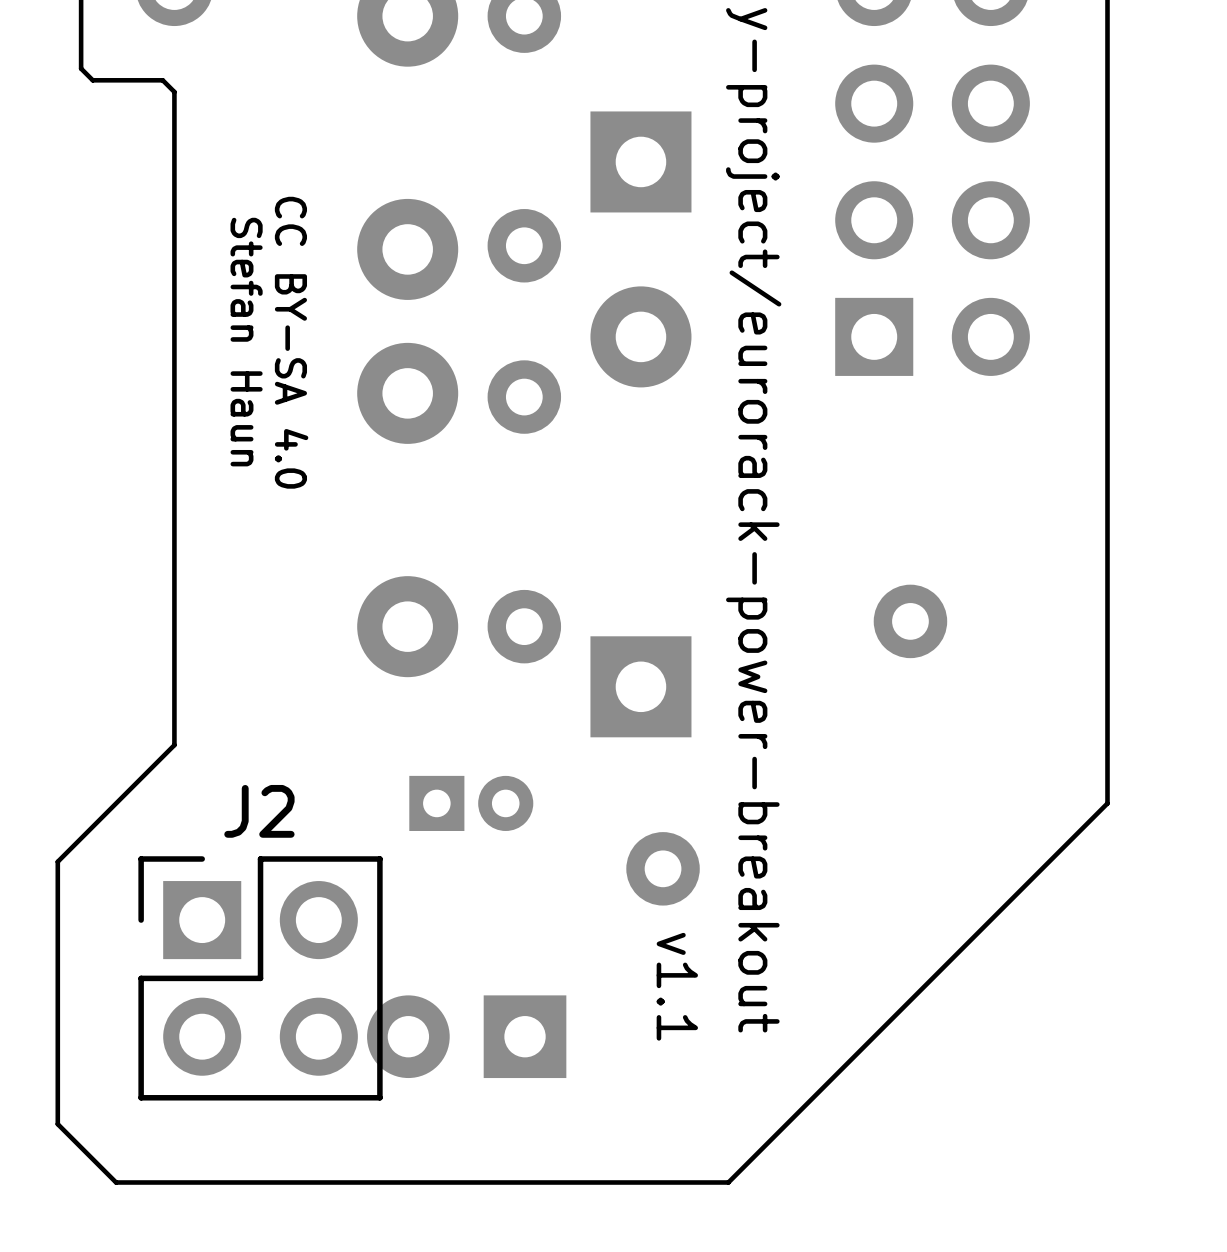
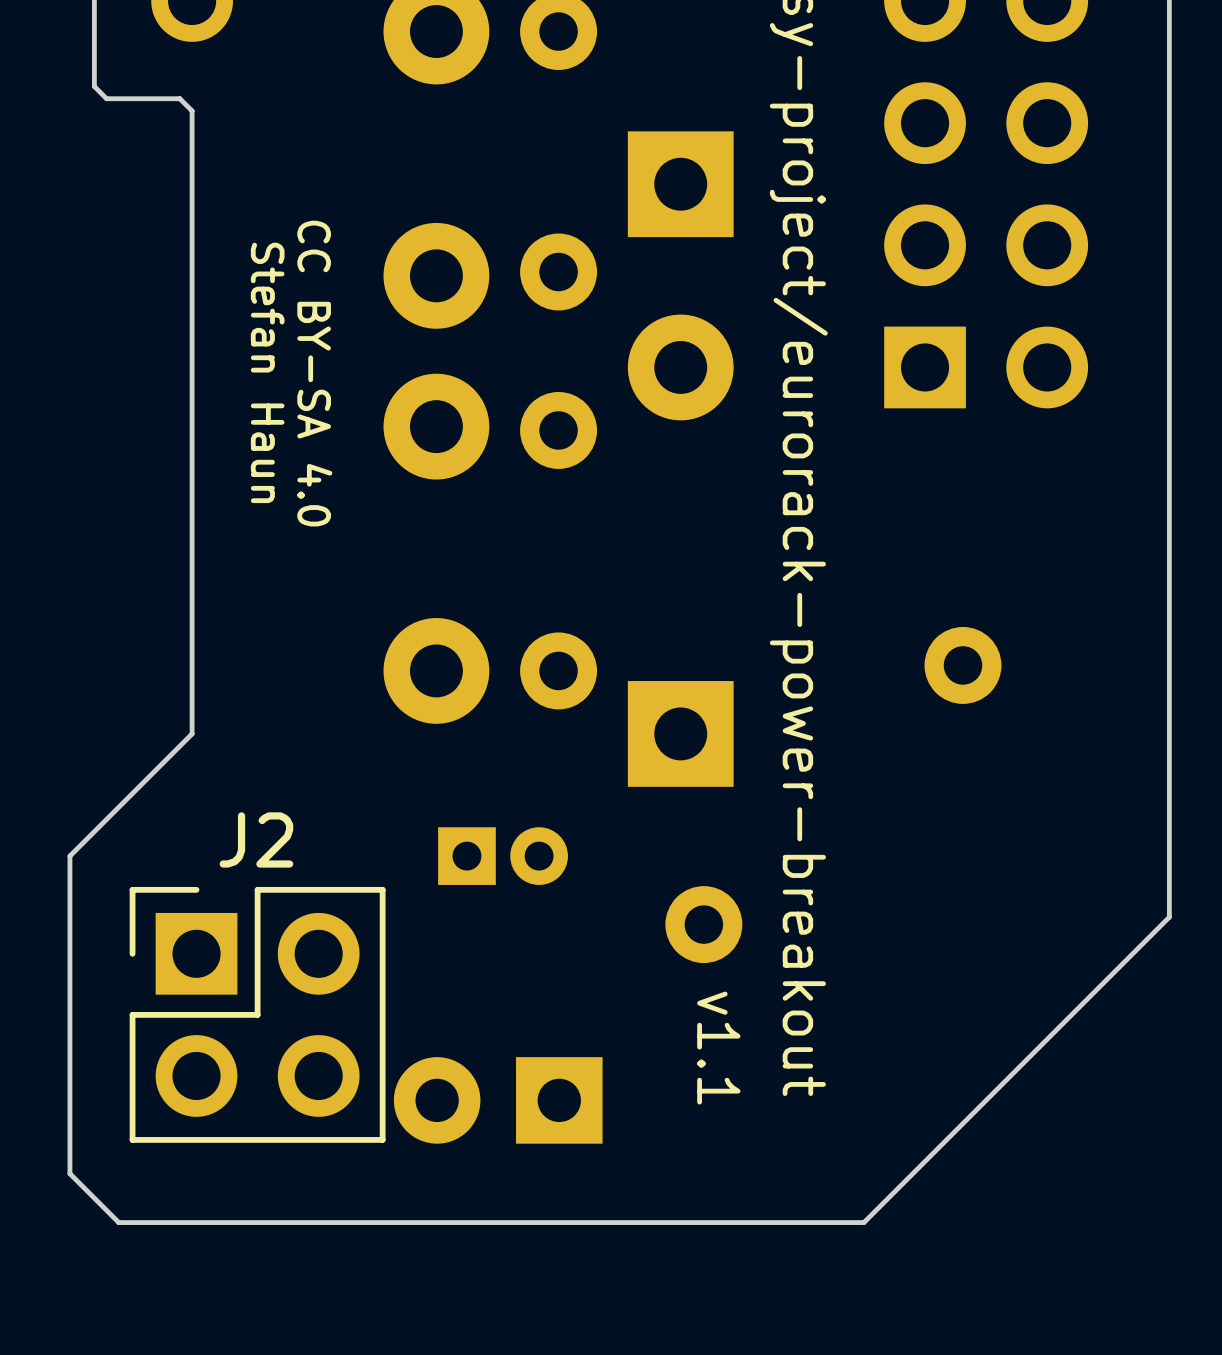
board edge: (174, 686) (174, 745) (57, 861) -> (192, 733) (69, 856) (69, 917)
board edge: (1107, 803) (728, 1182) (116, 1182) (57, 1124) (57, 1106) -> (1169, 856) (1169, 917) (863, 1222) (118, 1222) (69, 1173)
J2 position: (260, 978) -> (257, 1014)

